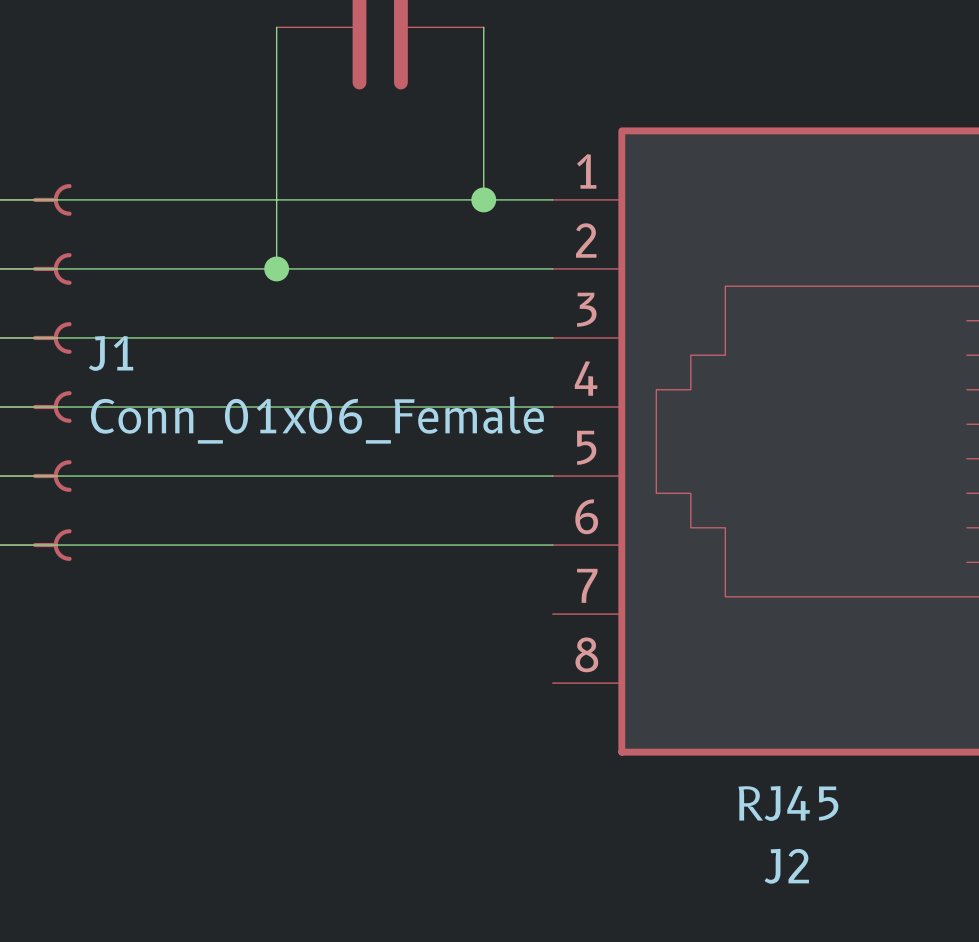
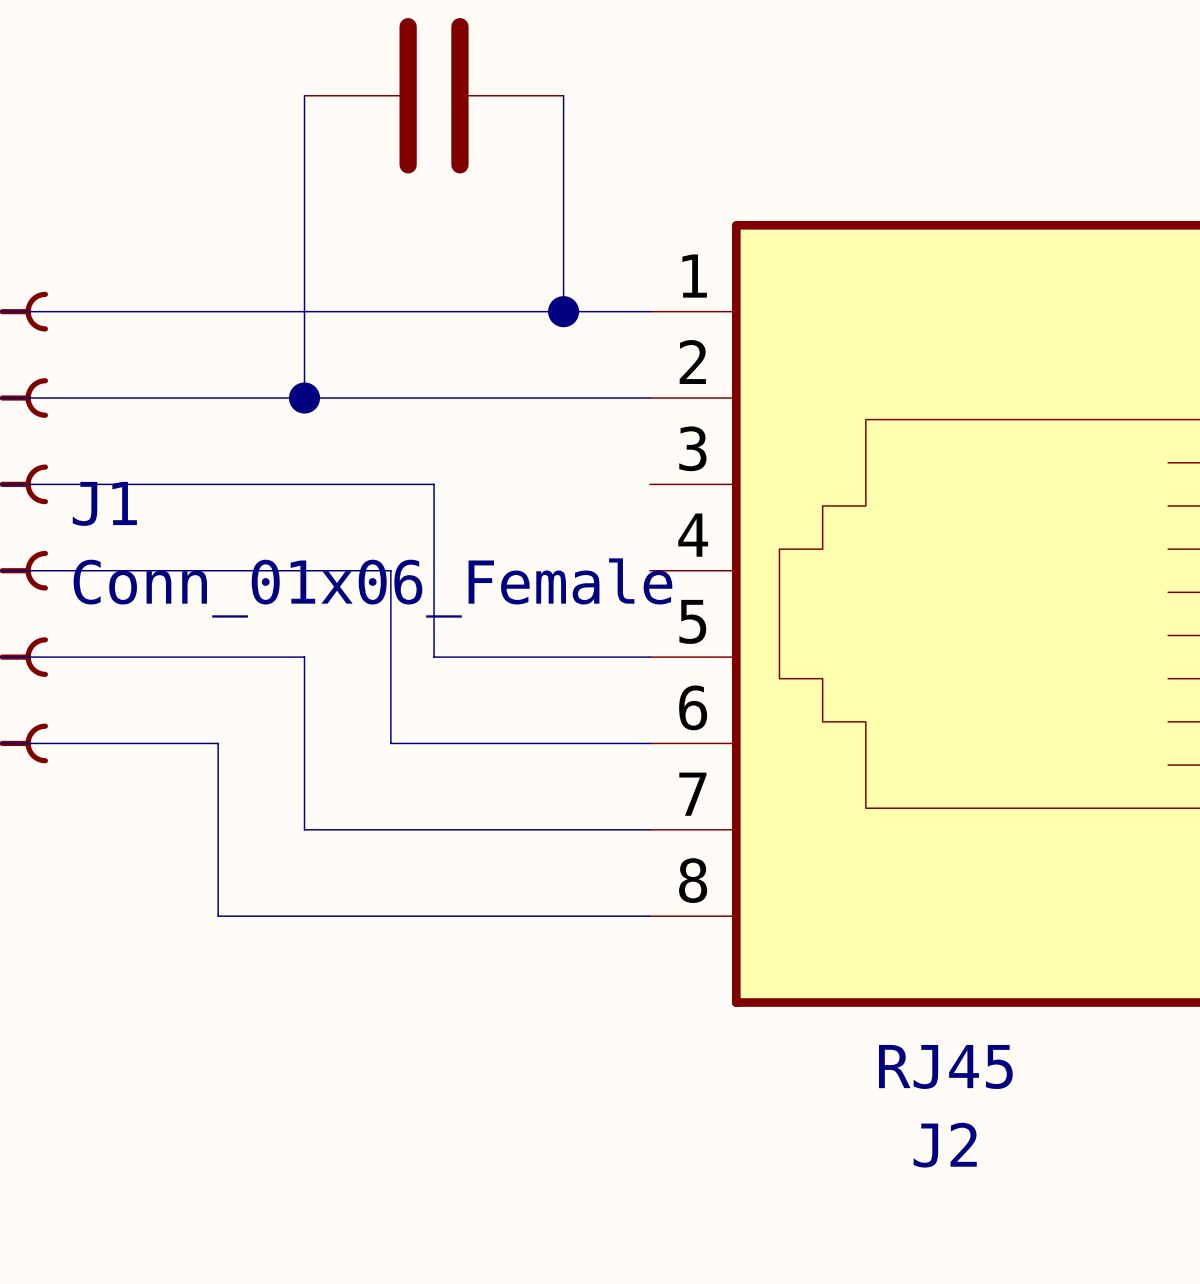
wire: (380, 337) (552, 337) -> none
wire: (345, 407) (552, 407) -> none
wire: (276, 476) (380, 476) -> (434, 484) (434, 657)
wire: none -> (304, 657) (304, 829) (649, 829)
wire: (207, 545) (345, 545) -> (390, 570) (390, 743)
wire: none -> (218, 743) (218, 916) (649, 916)

